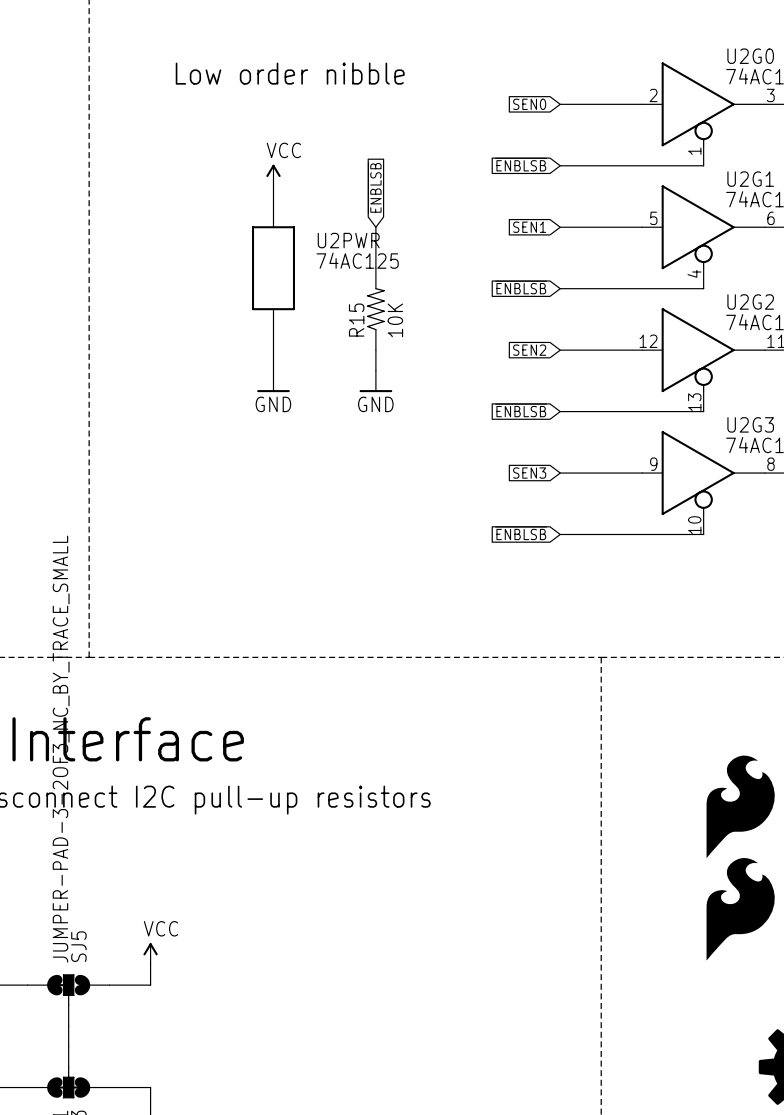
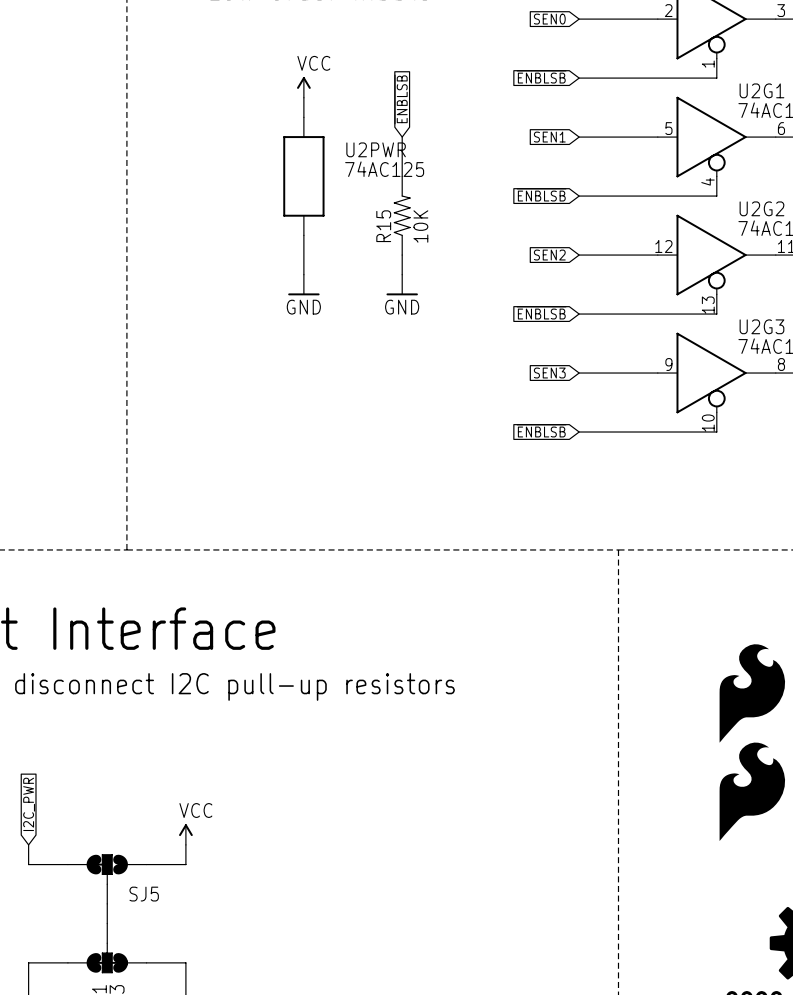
SJ5 value: JUMPER-PAD-3-2OF3_NC_BY_TRACE_SMALL (61, 749) -> none
SJ5 name rotation: 0° (78, 946) -> 90° clockwise (144, 894)
SJ5 name position: SJ5 (78, 946) -> SJ5 (144, 894)

